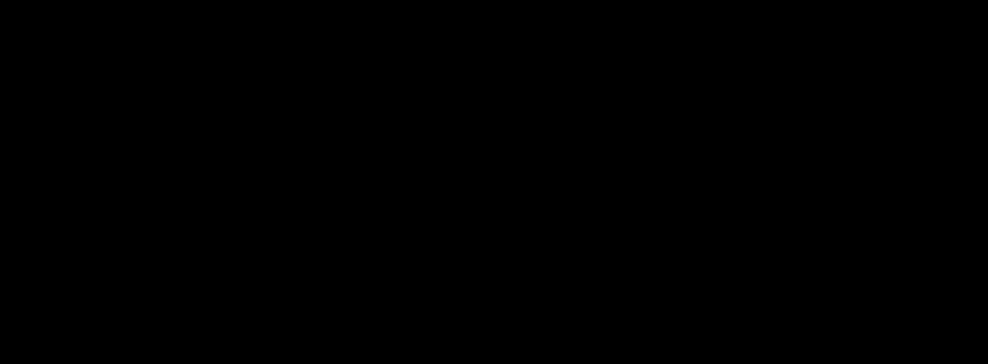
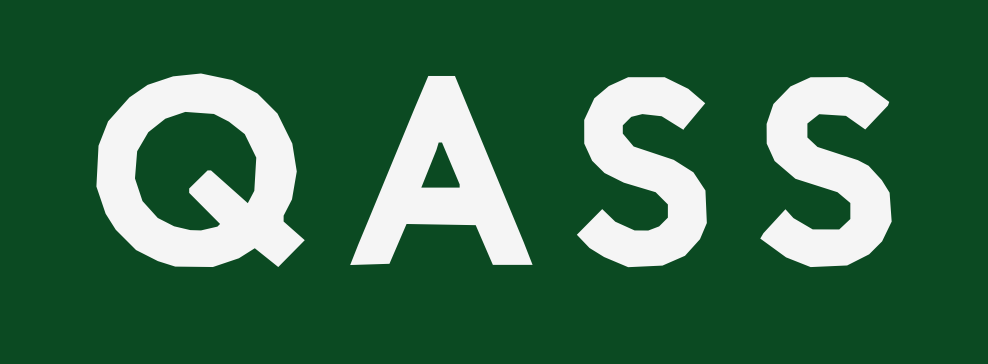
drawing: none -> [96, 73, 305, 268]
drawing: none -> [350, 75, 533, 266]
drawing: none -> [576, 77, 707, 268]
drawing: none -> [760, 77, 892, 268]

